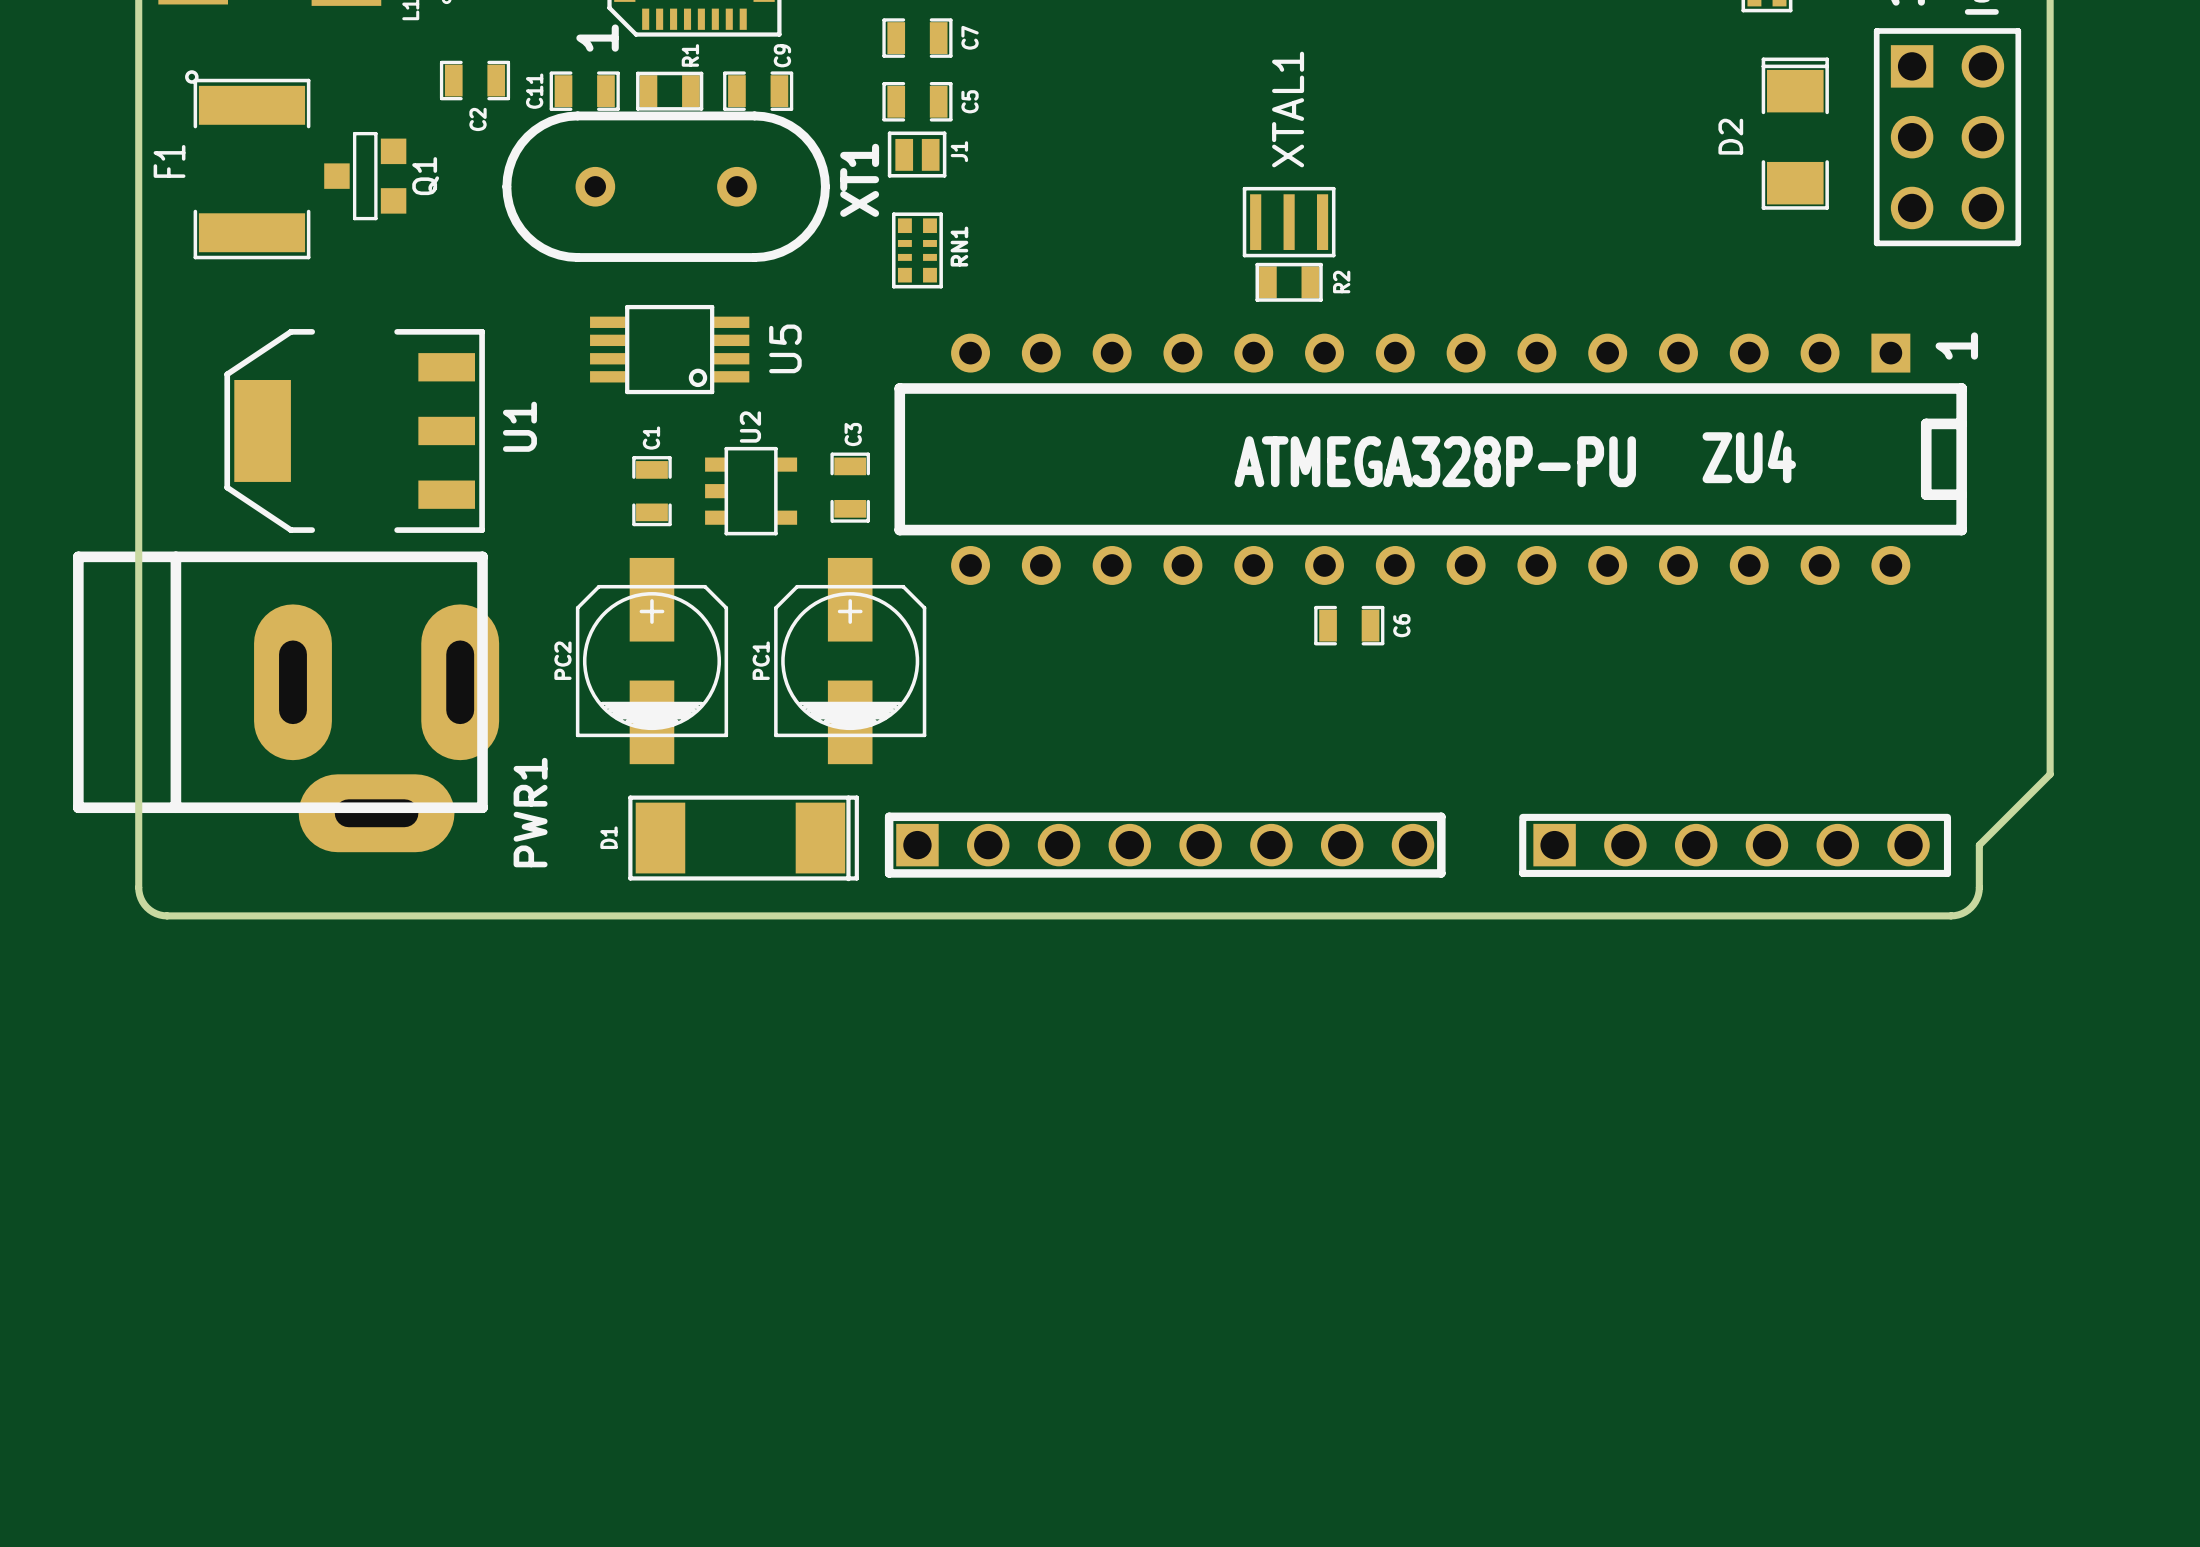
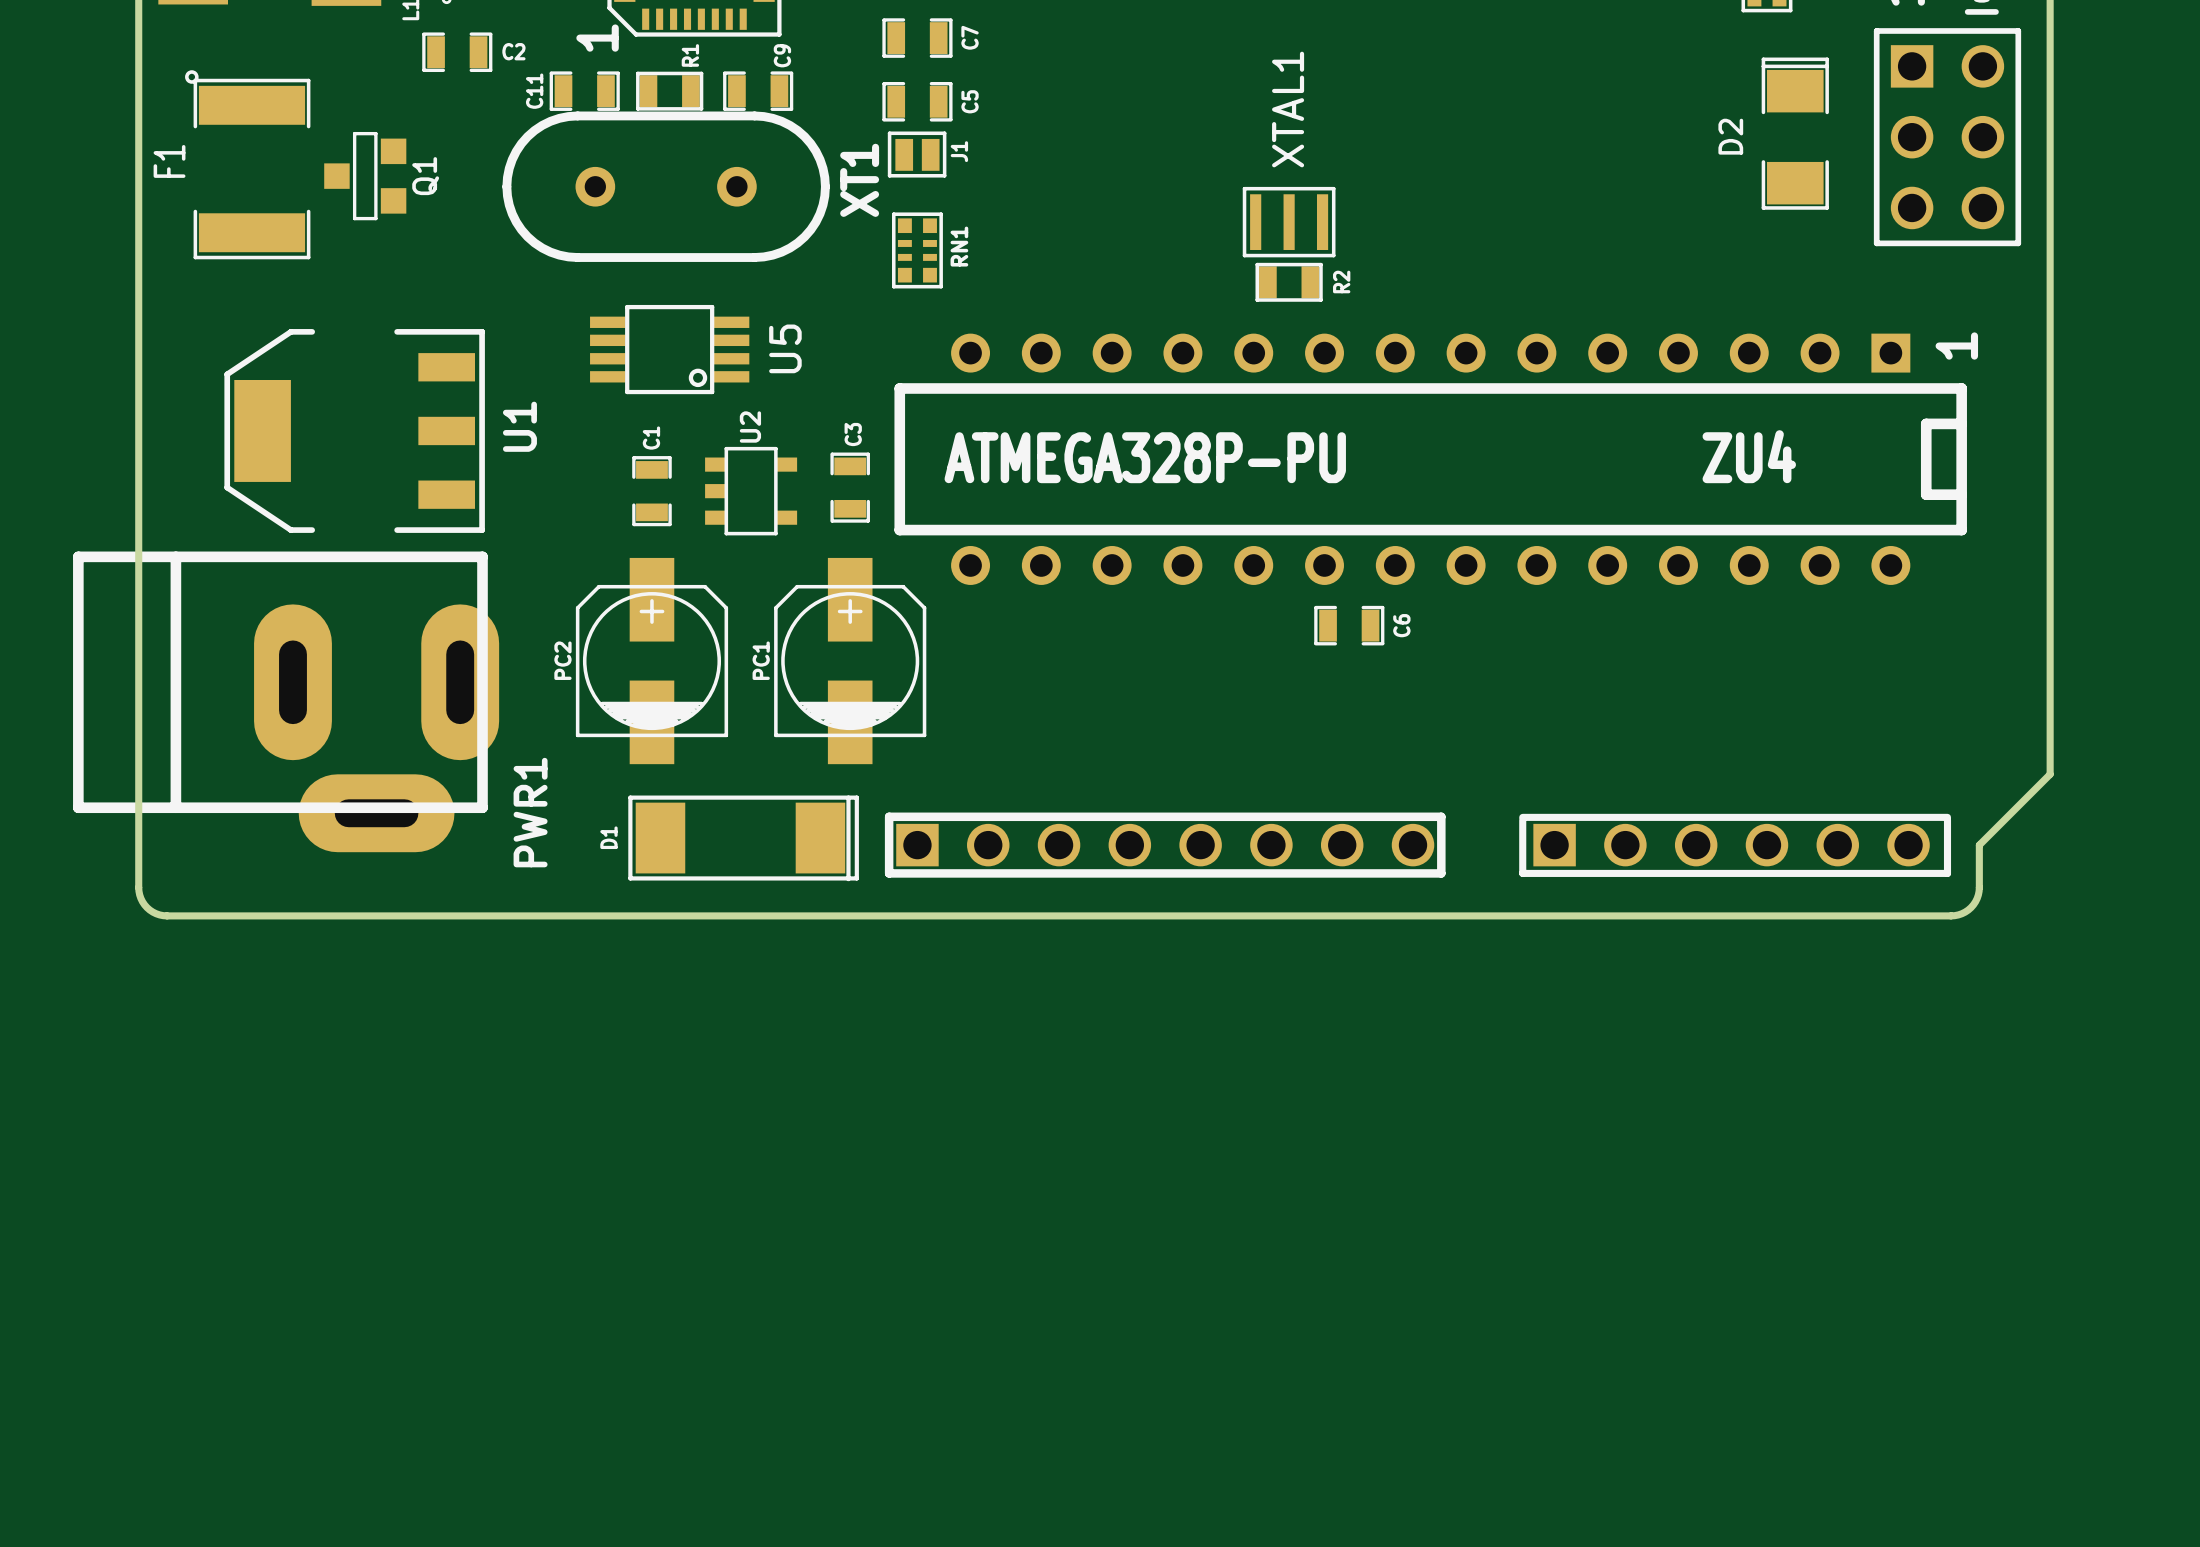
C2 position: (474, 80) -> (457, 52)
C2 name rotation: 0° (478, 119) -> 90° clockwise (513, 51)
C2 name position: C2 (478, 119) -> C2 (513, 51)
ZU4 value position: ATMEGA328P-PU (1435, 461) -> ATMEGA328P-PU (1145, 457)

